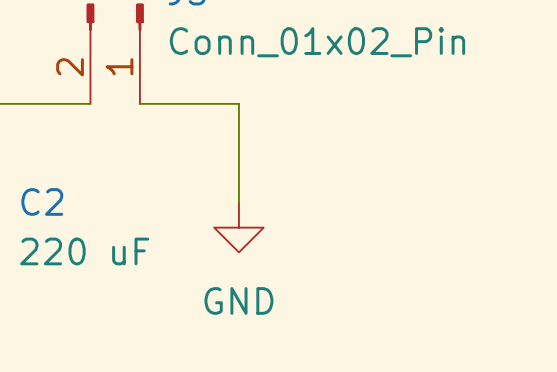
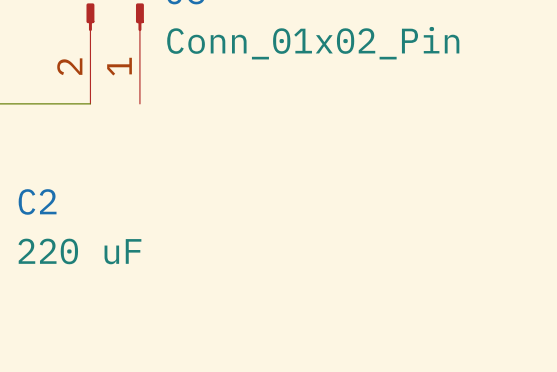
wire: (139, 103) (238, 103) (238, 202) -> none
power symbol: GND (238, 227) -> none

